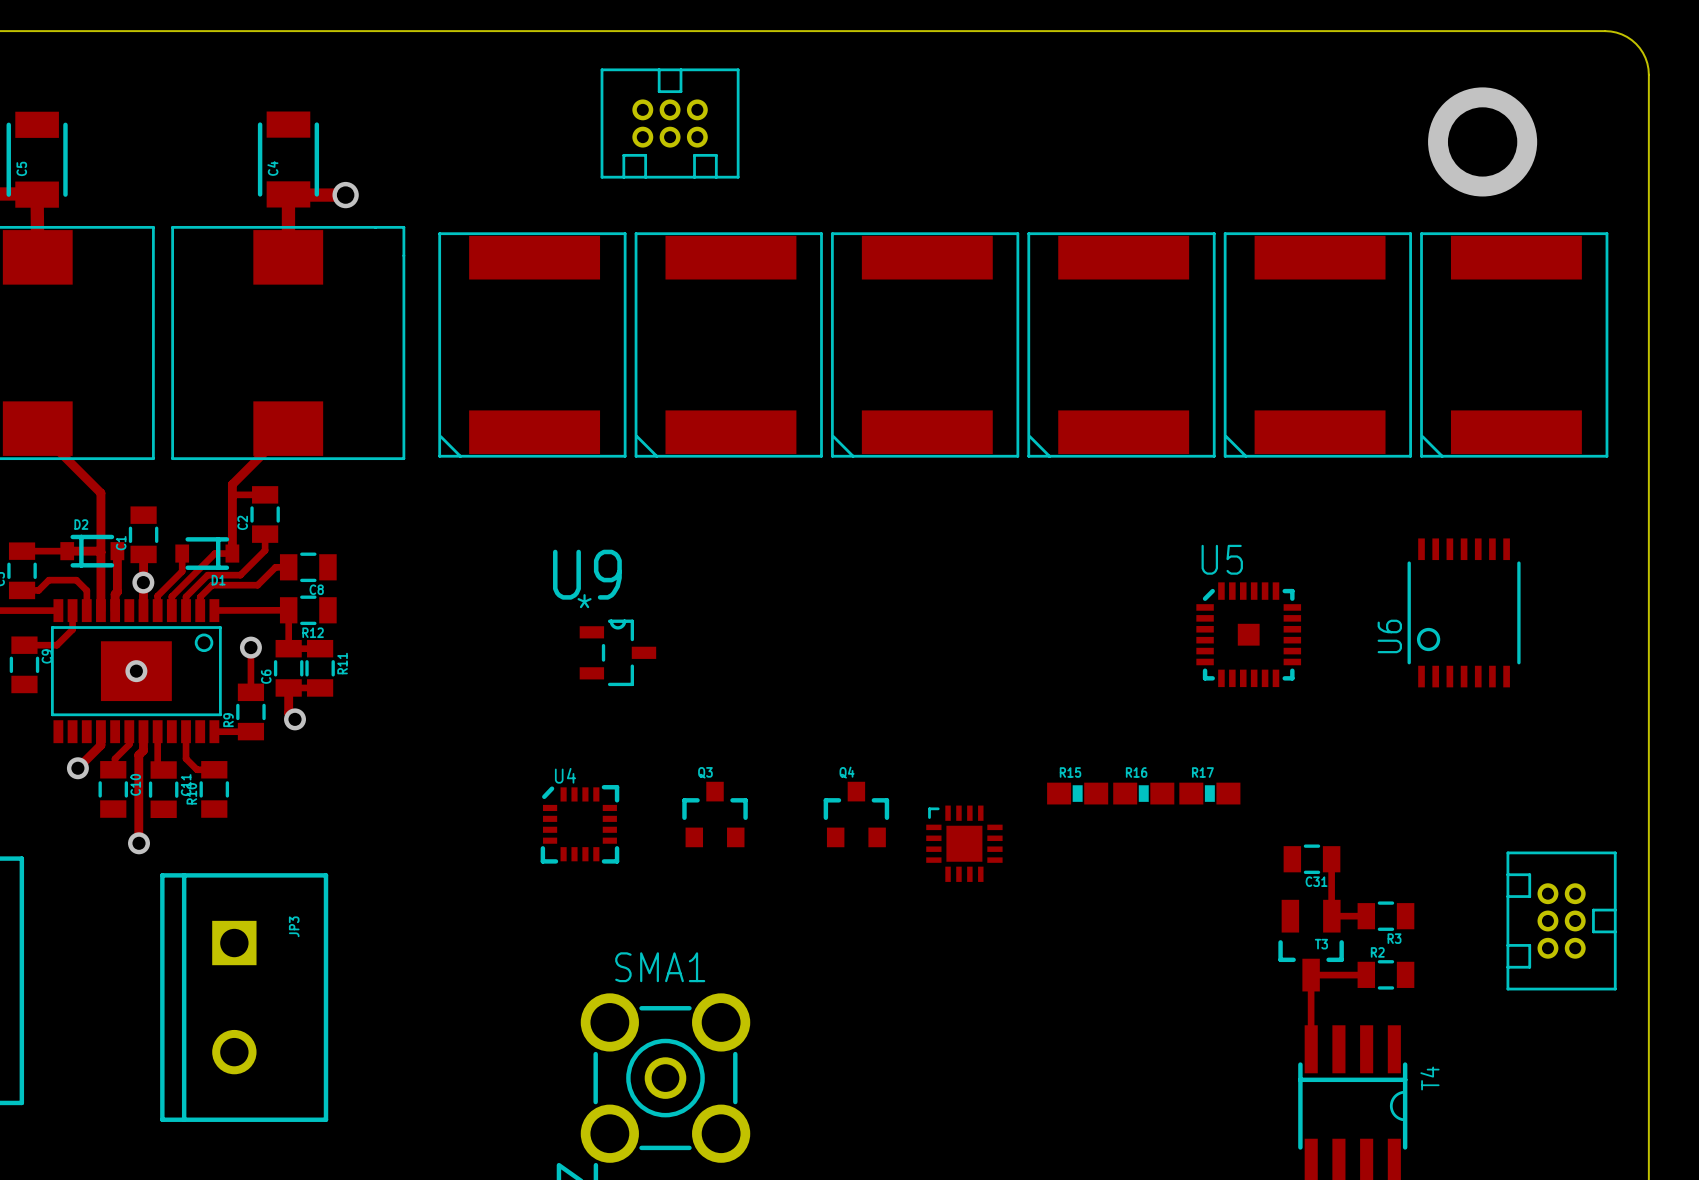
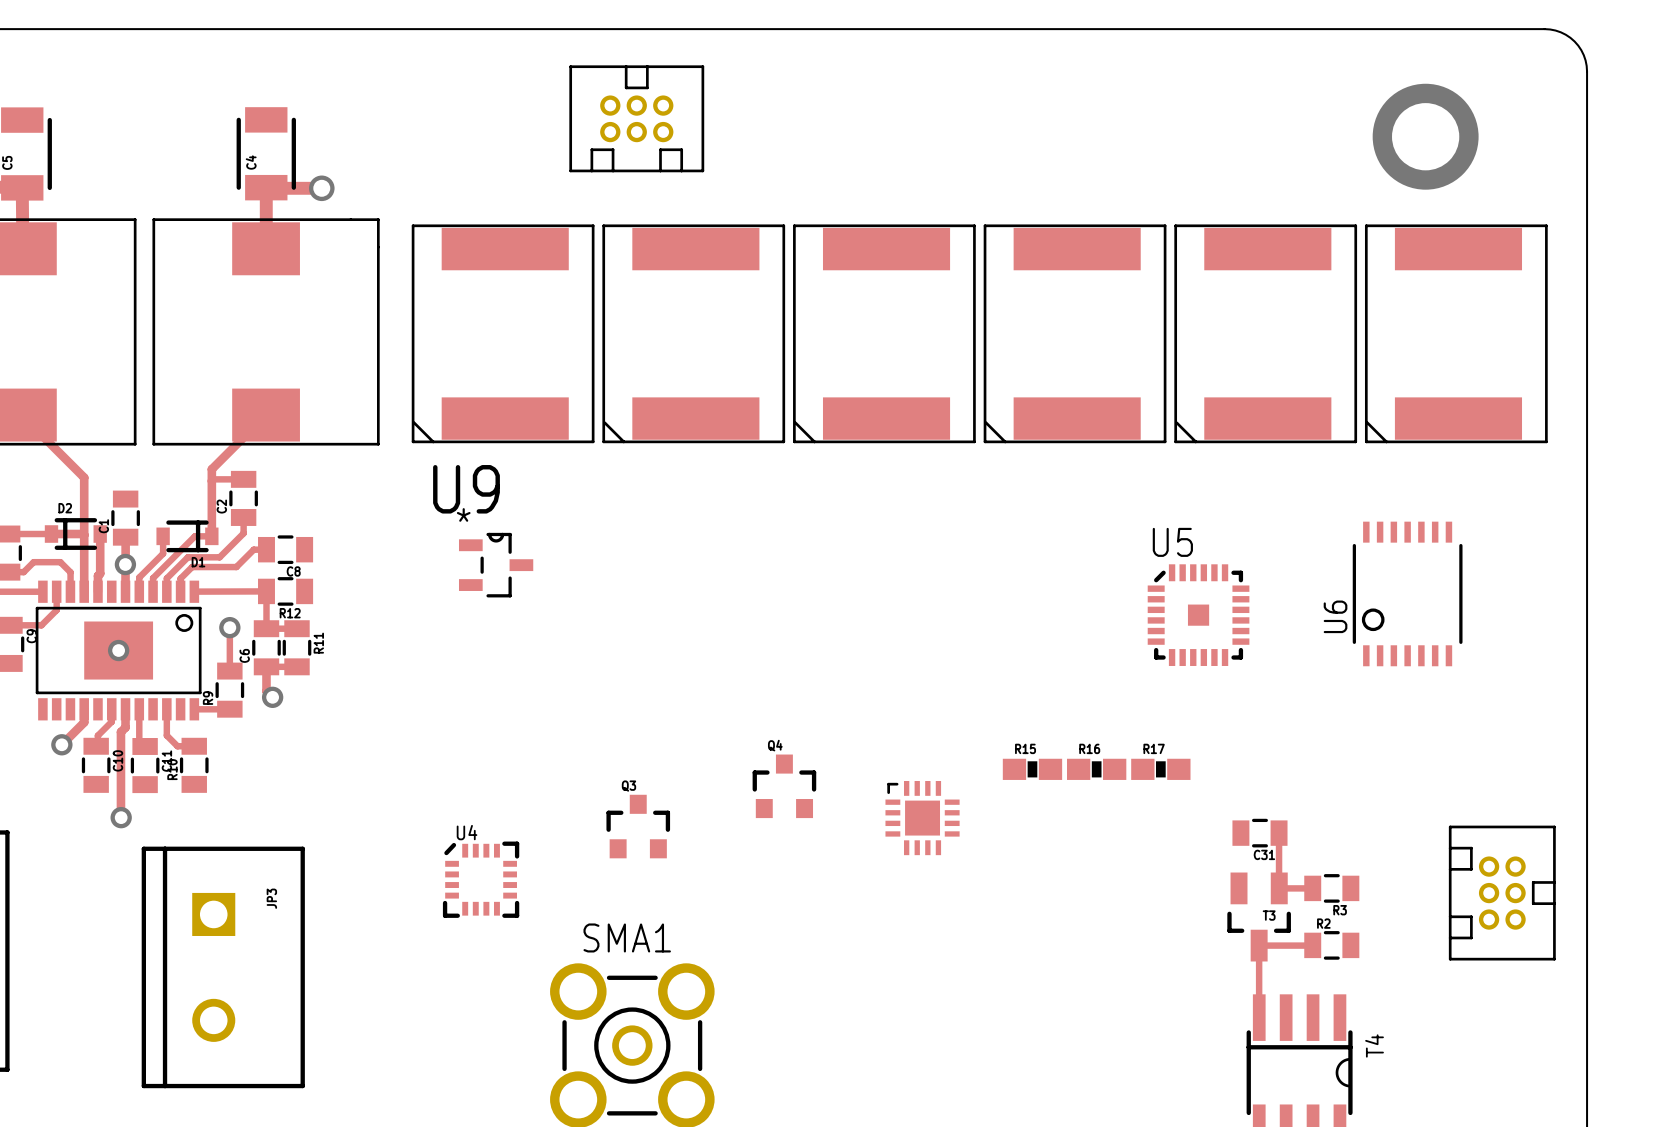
U9 position: (617, 652) -> (496, 565)
Q3 position: (715, 814) -> (638, 826)
Q4 position: (856, 814) -> (784, 786)
U4 position: (579, 824) -> (481, 879)

